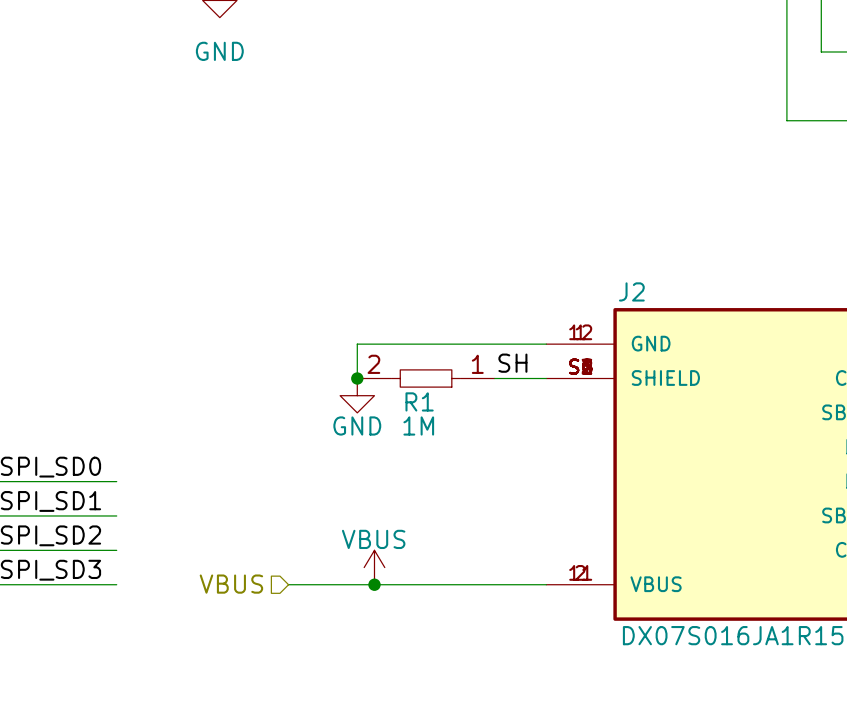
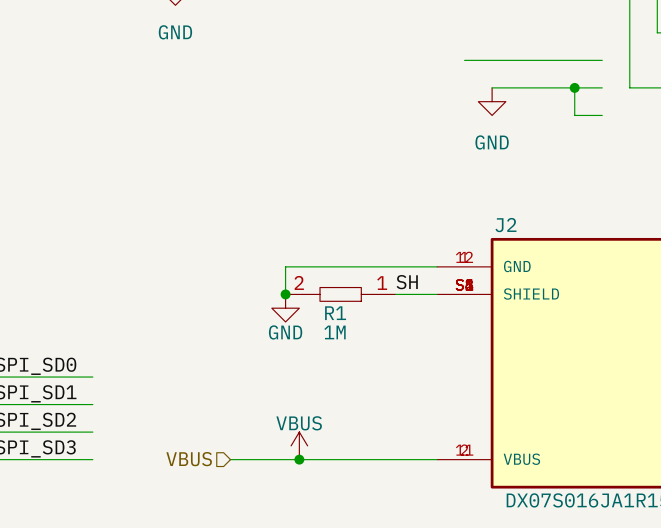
wire: none -> (464, 60) (602, 60)
wire: none -> (492, 87) (602, 87)
wire: none -> (574, 87) (574, 115) (602, 115)
junction: none -> (574, 87)
power symbol: none -> GND (492, 101)

